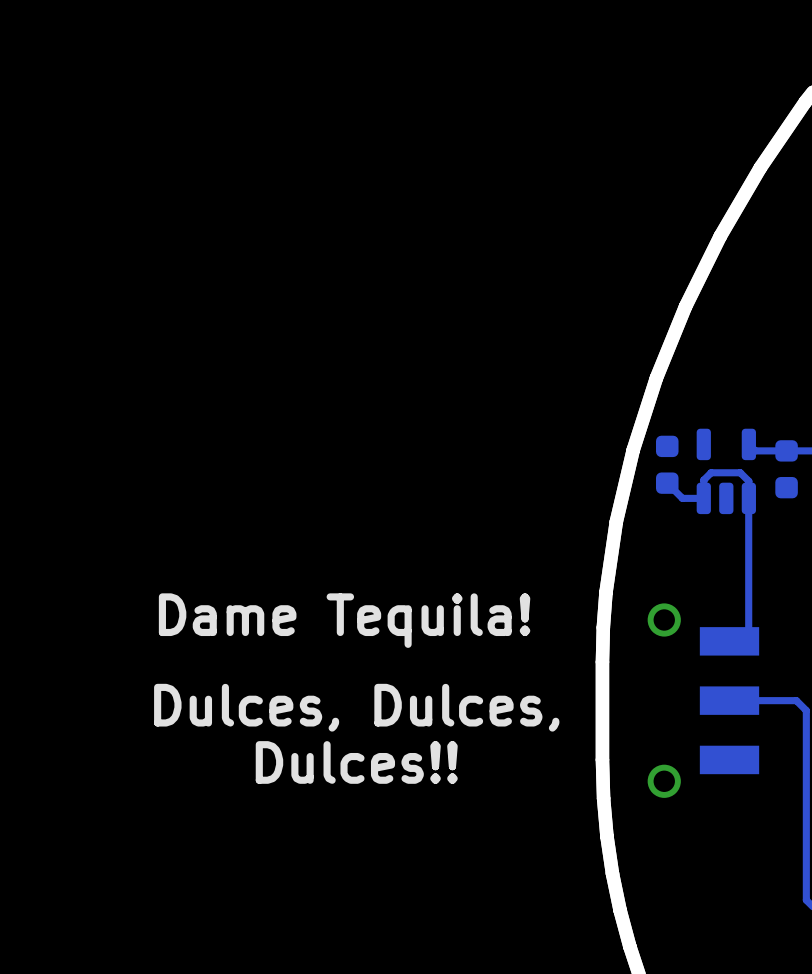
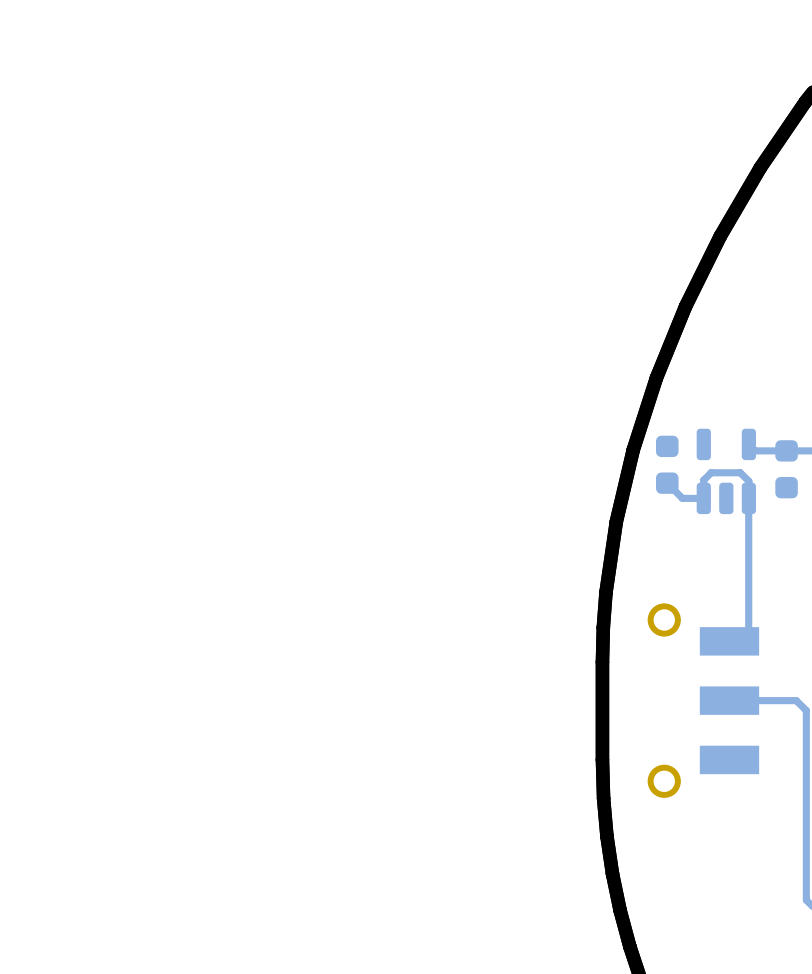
text: Dame Tequila! (344, 620) -> none
text: Dulces, Dulces, (356, 707) -> none
text: Dulces!! (356, 762) -> none

